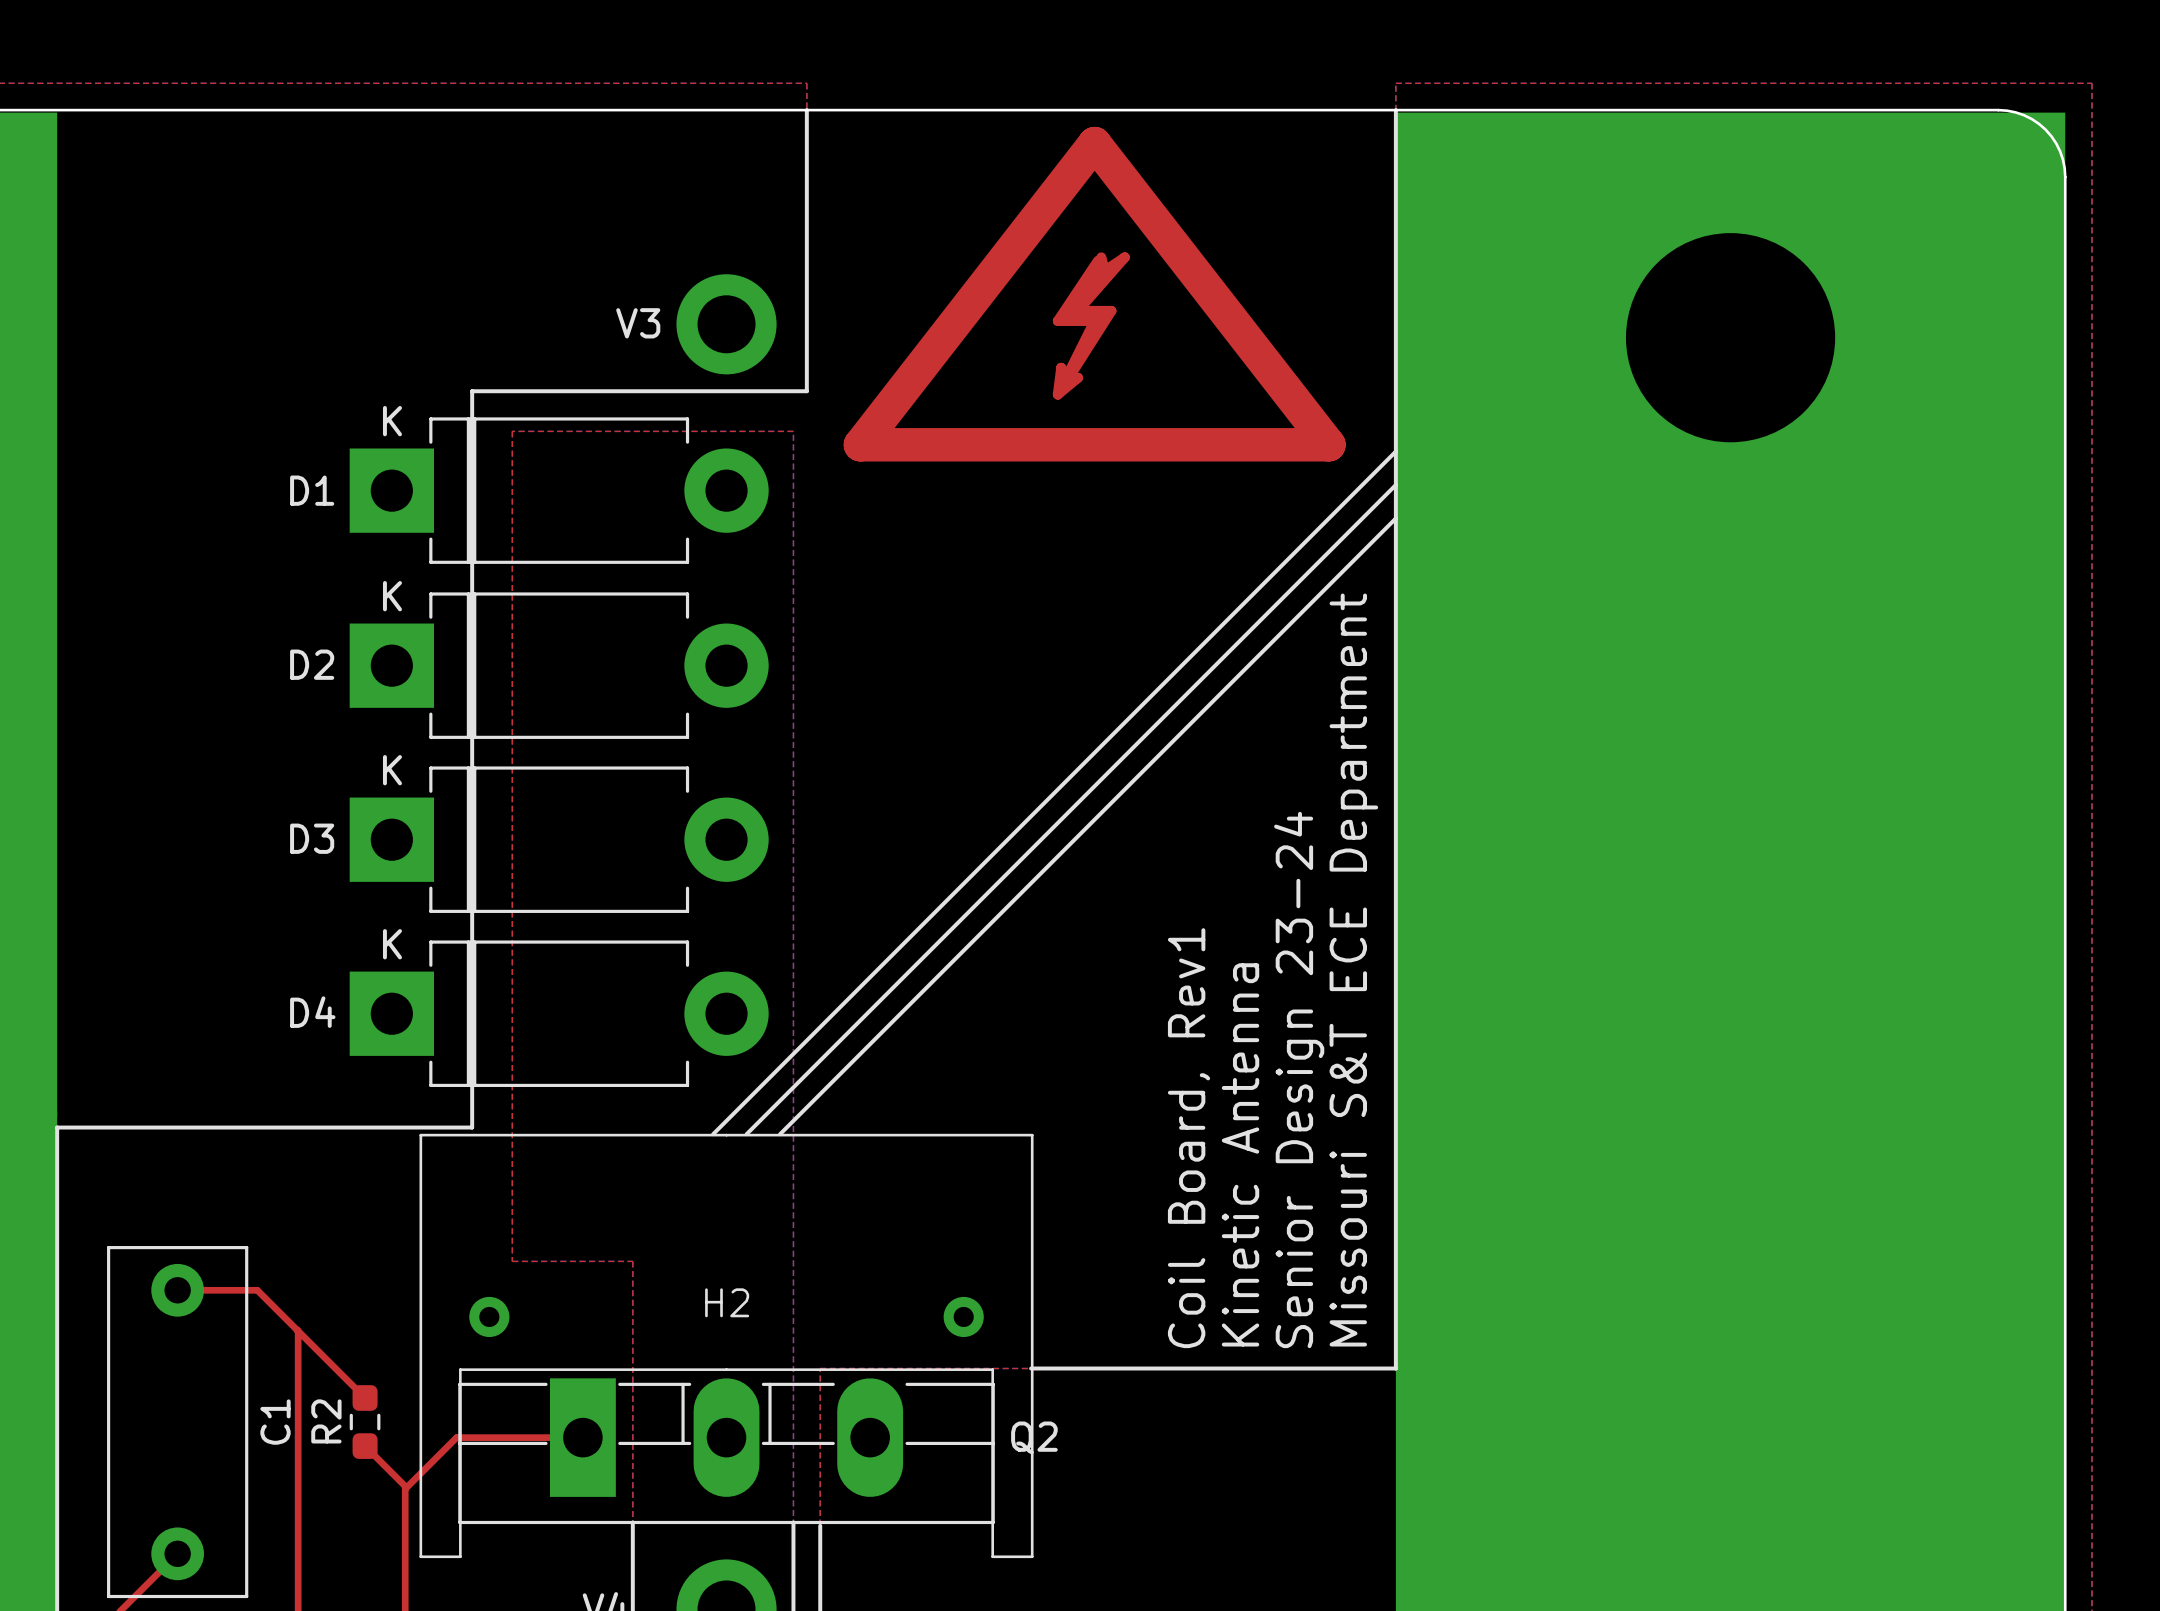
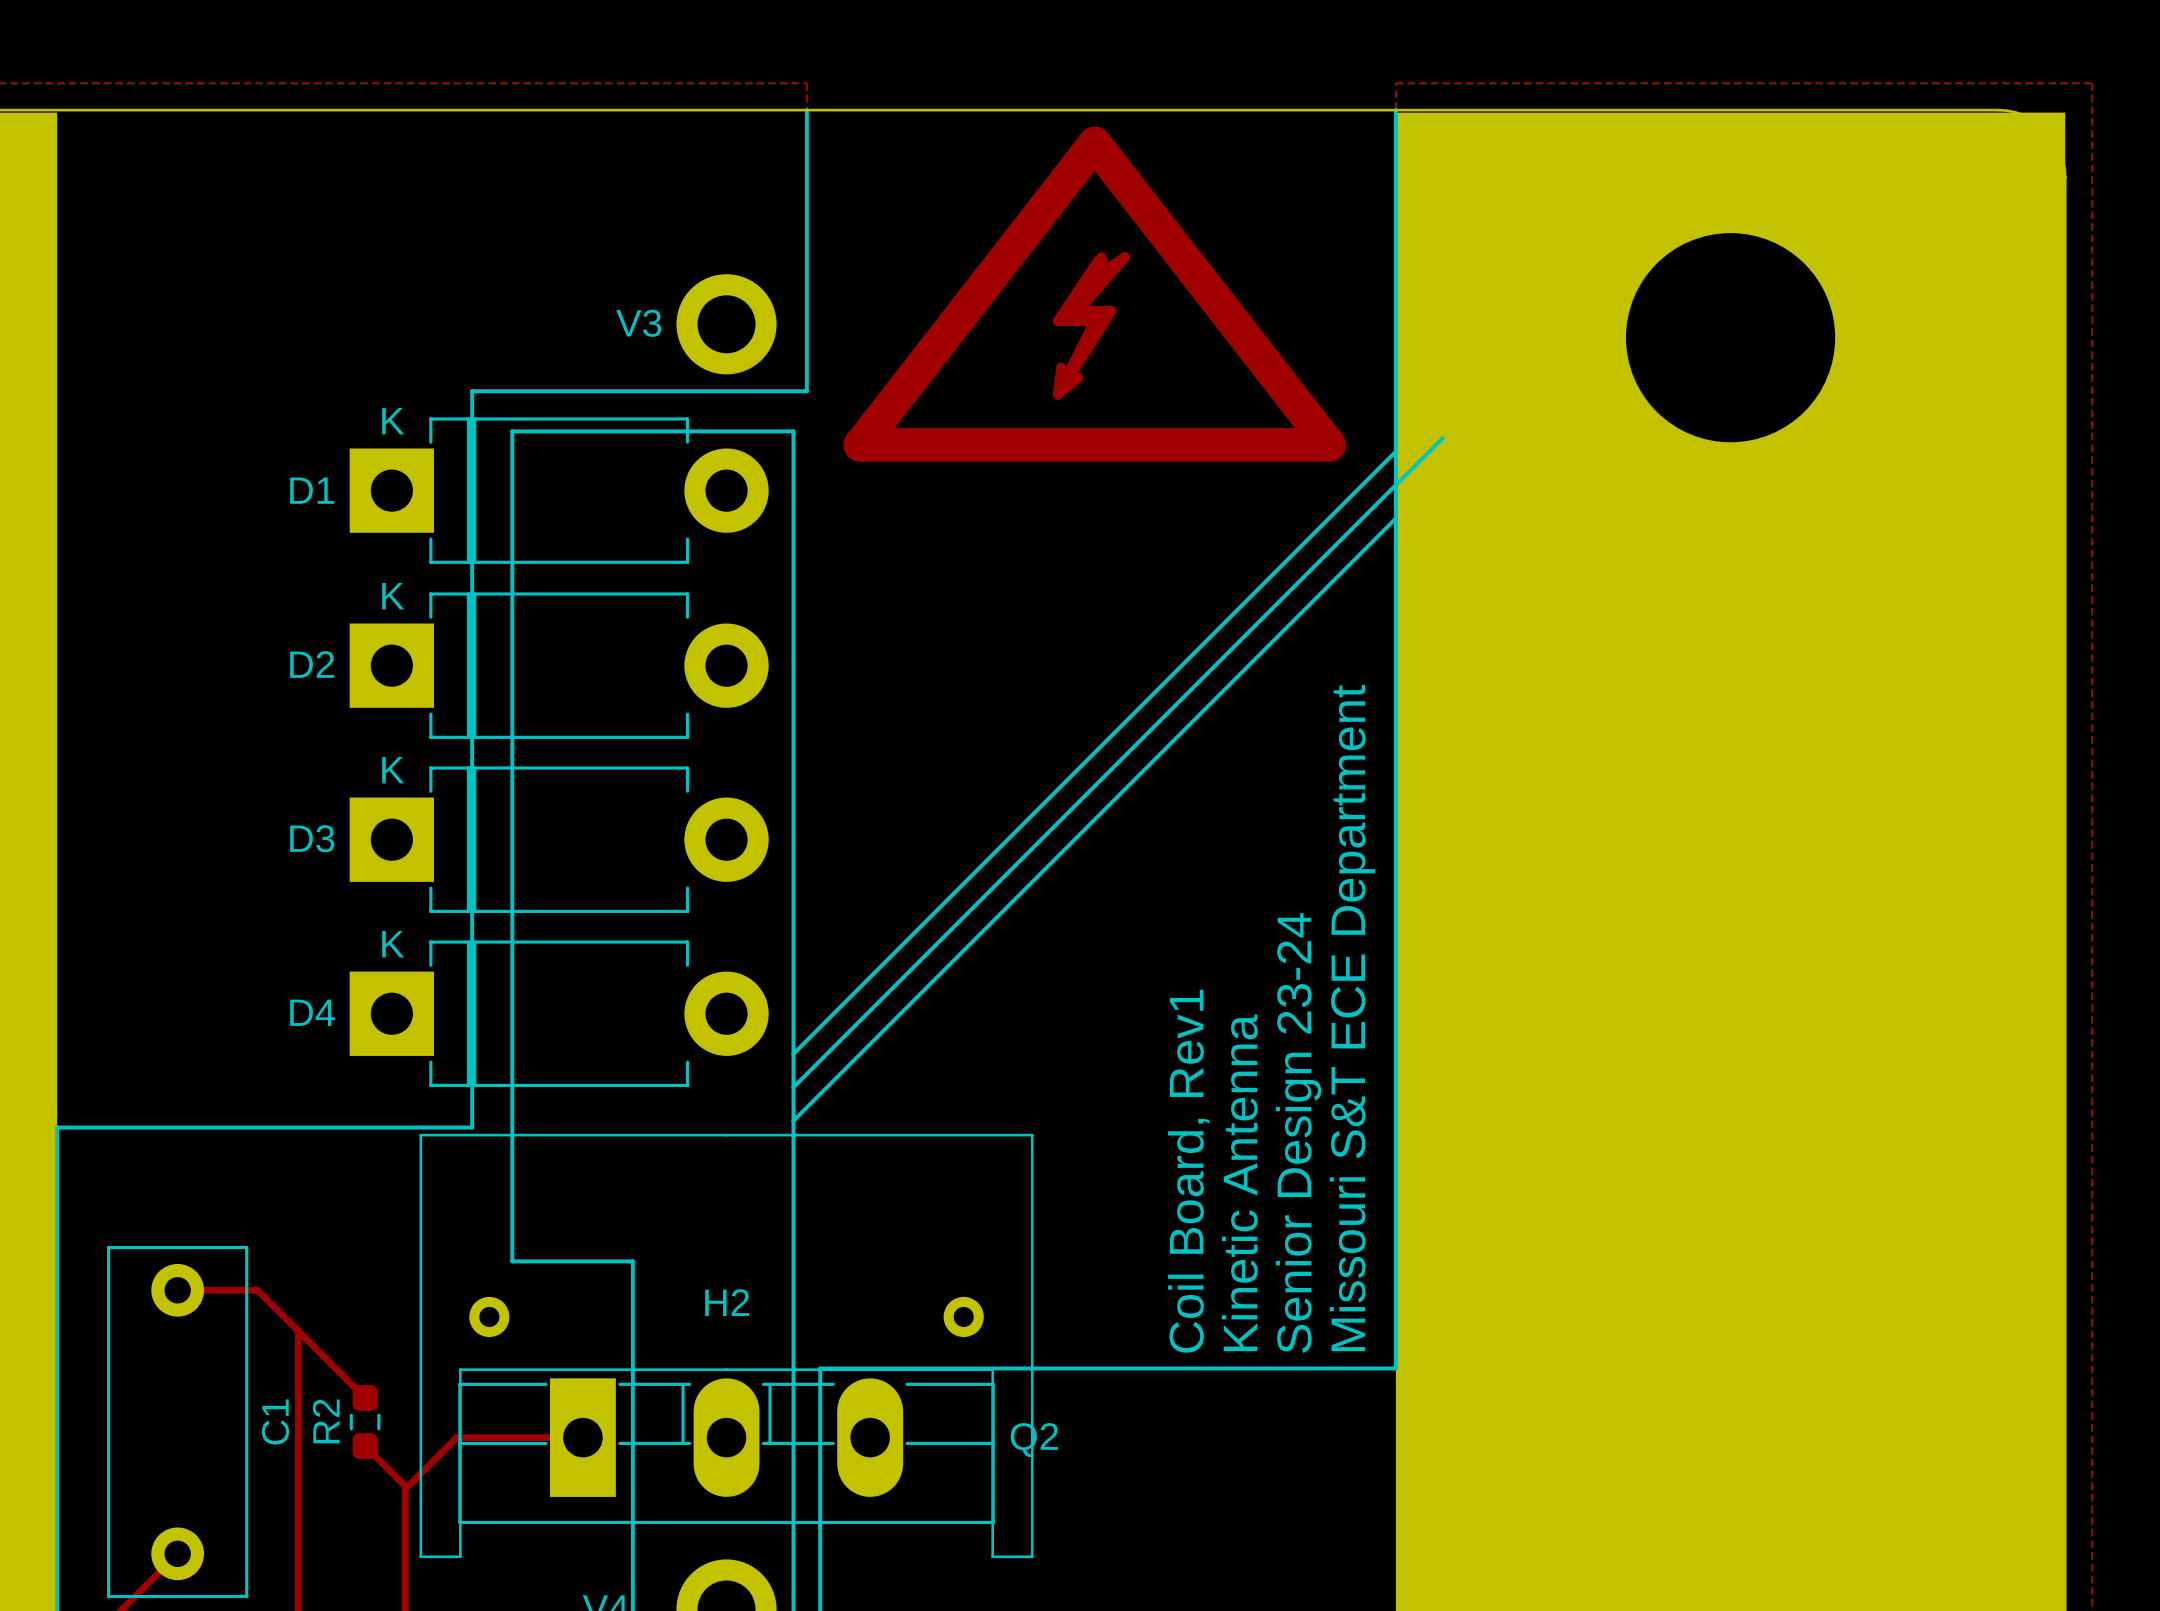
line: none -> (1442, 438) (1395, 484)
line: (793, 1053) (713, 1134) -> none
line: (793, 1087) (746, 1134) -> none
line: (793, 1120) (780, 1134) -> none
line: none -> (1031, 1368) (820, 1368) (820, 1525)
line: none -> (632, 1522) (632, 1261) (512, 1261) (512, 431) (793, 431) (793, 1522)

